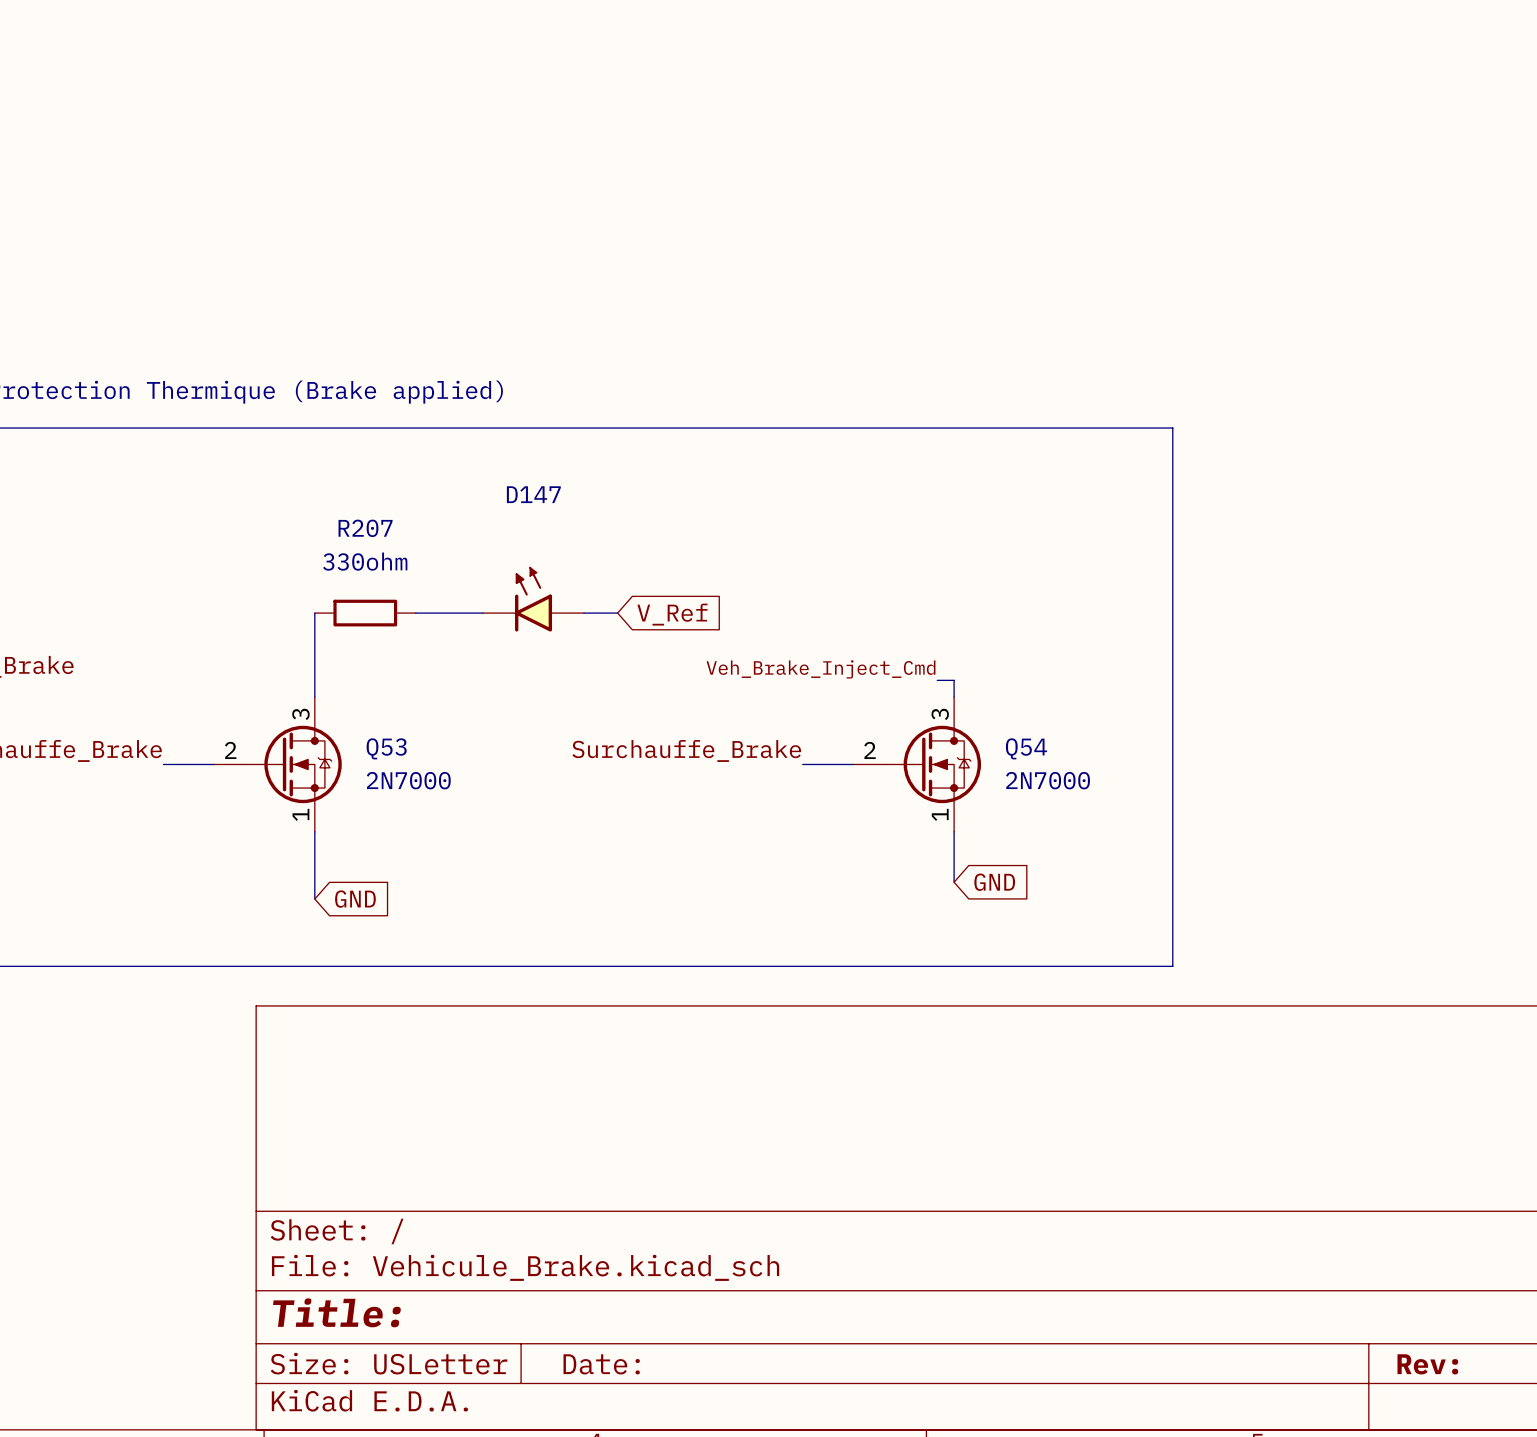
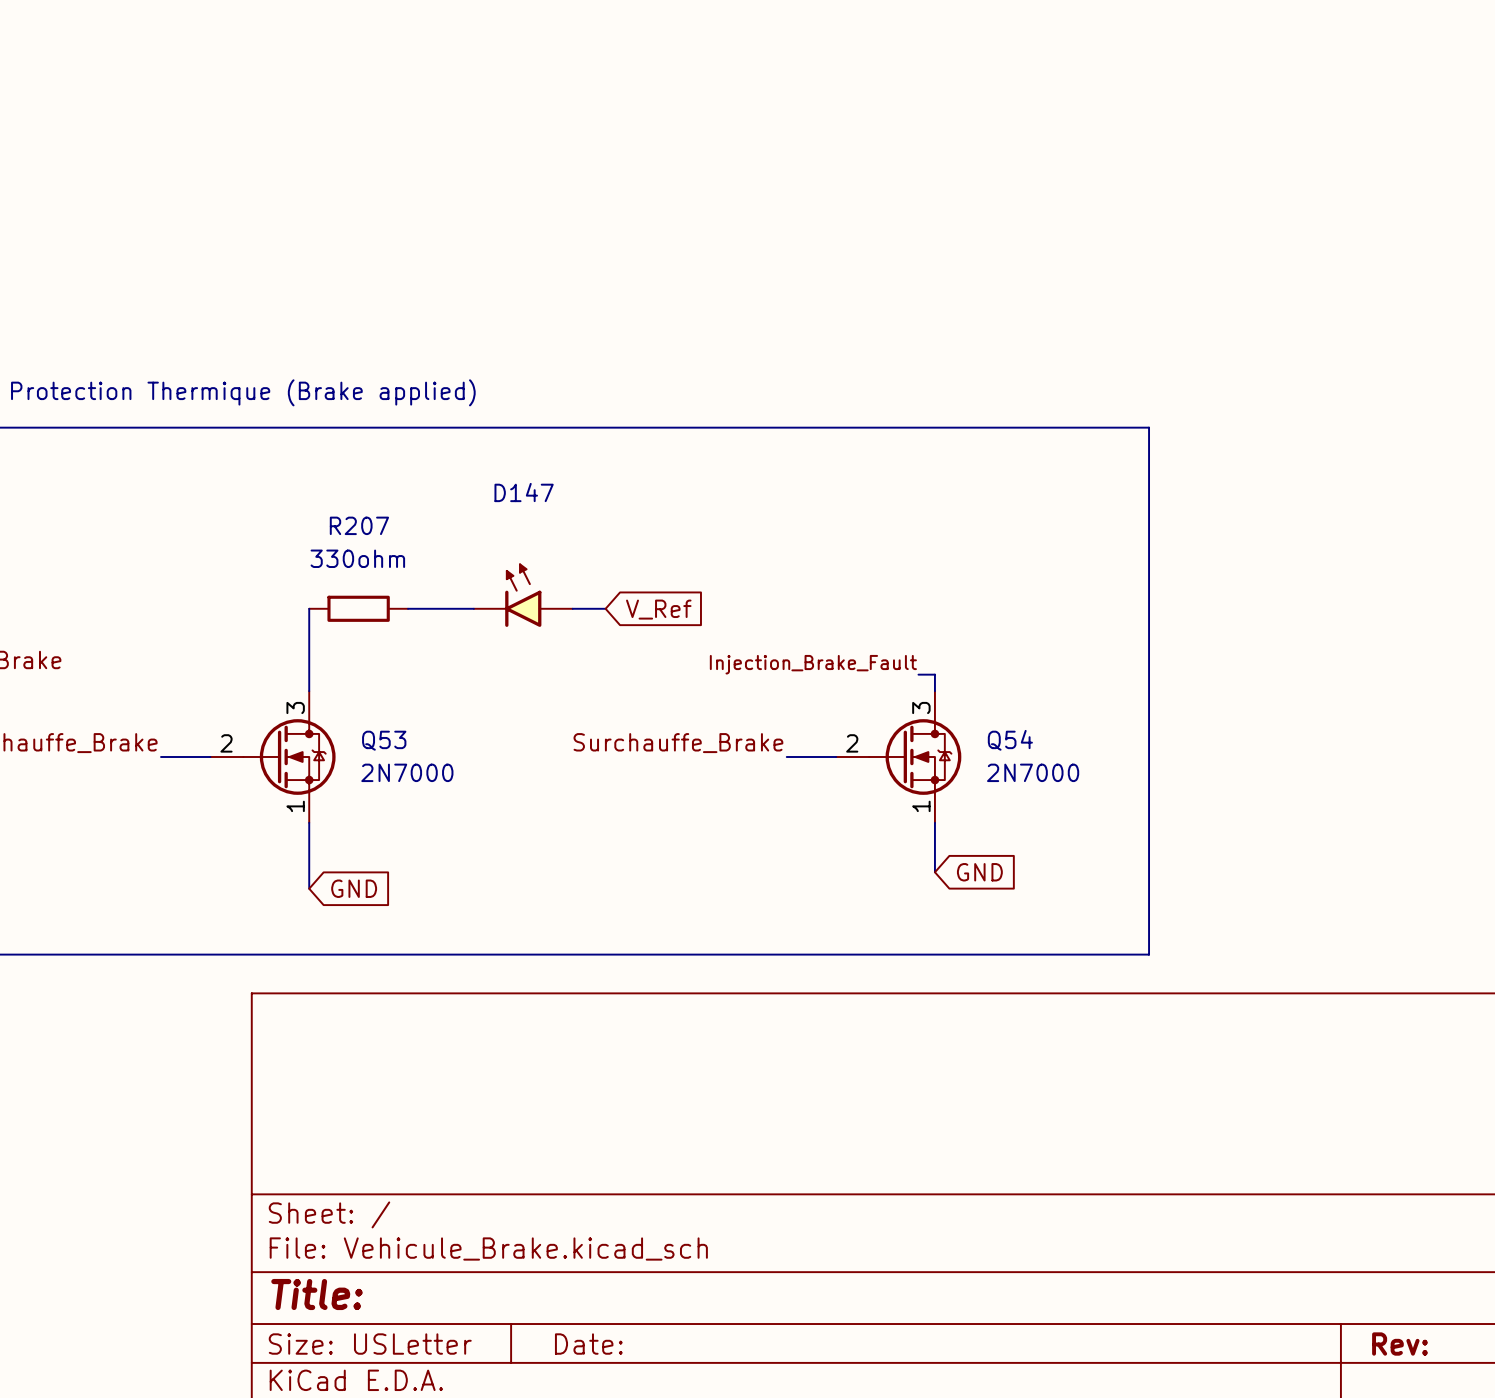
label: Veh_Brake_Inject_Cmd (821, 669) -> Injection_Brake_Fault (813, 664)

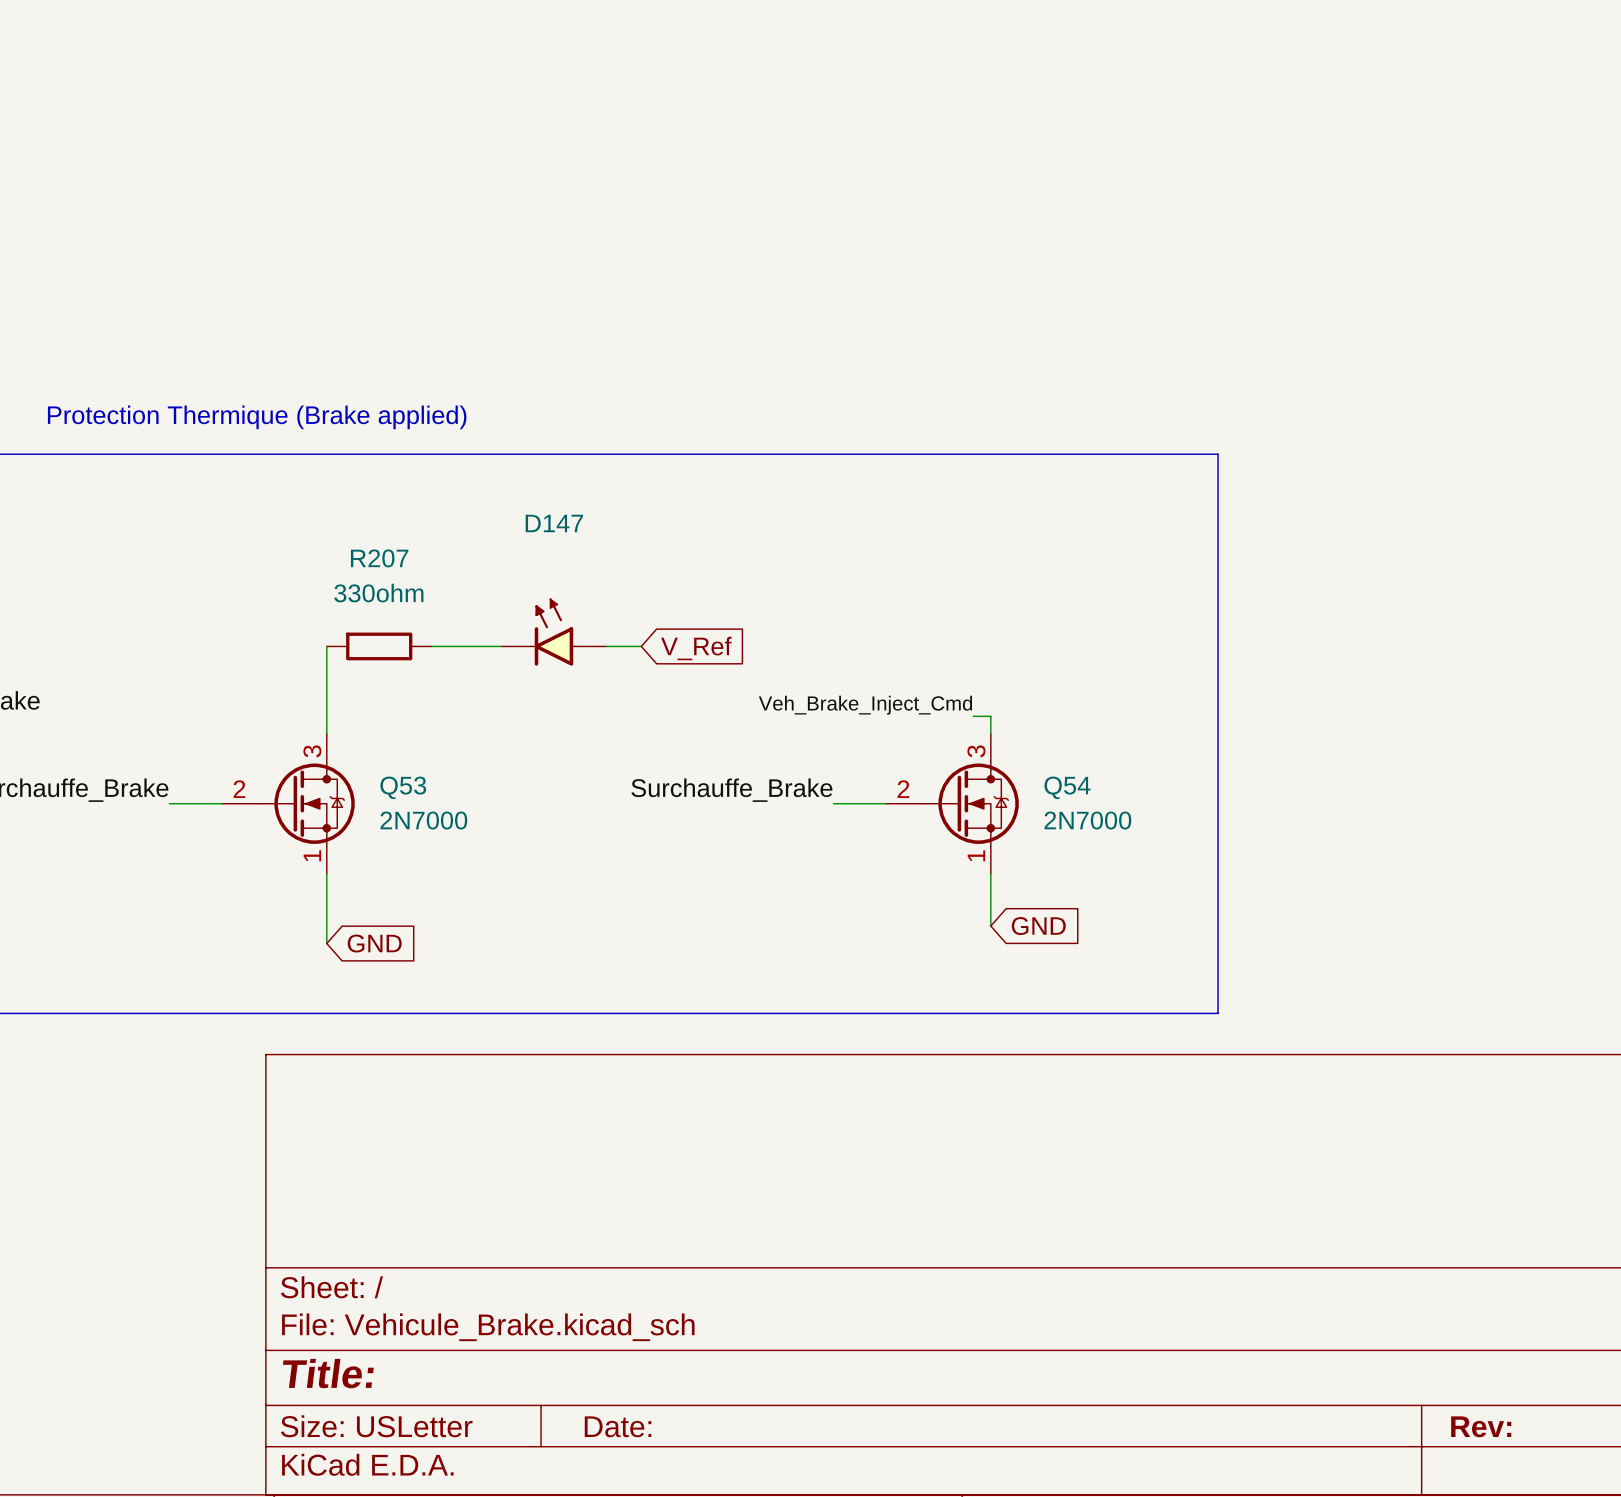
label: Injection_Brake_Fault (813, 664) -> Veh_Brake_Inject_Cmd (865, 705)

